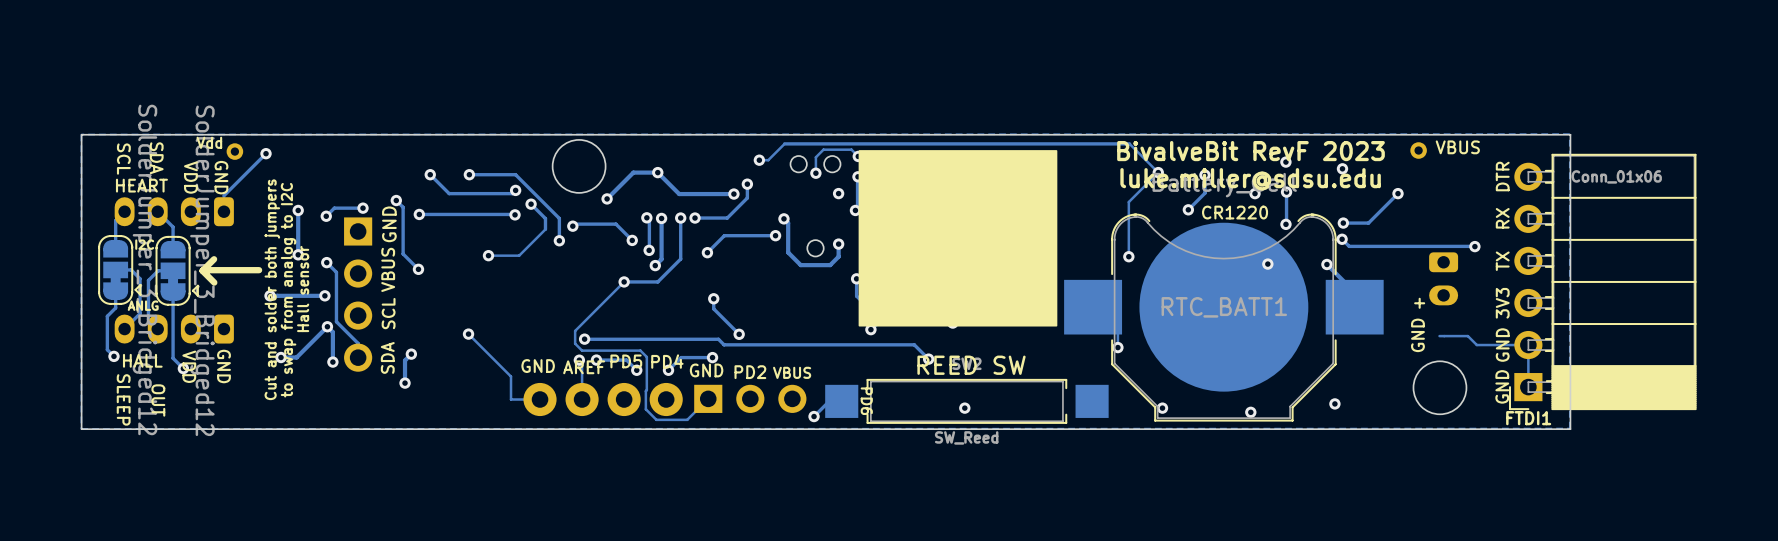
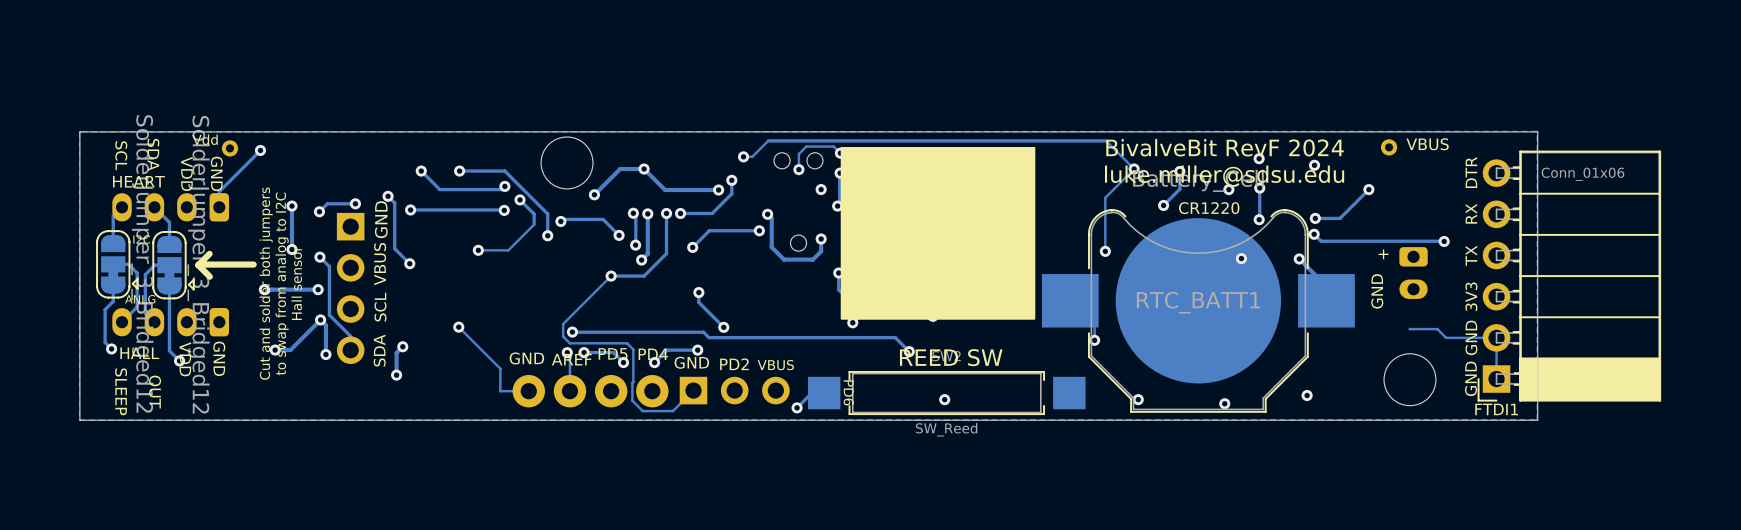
text: BivalveBit RevF 2023 (1250, 151) -> BivalveBit RevF 2024 (1225, 147)
text: none -> + (1383, 254)
text: + (1419, 303) -> GND (1377, 291)
text: GND (1417, 335) -> none

